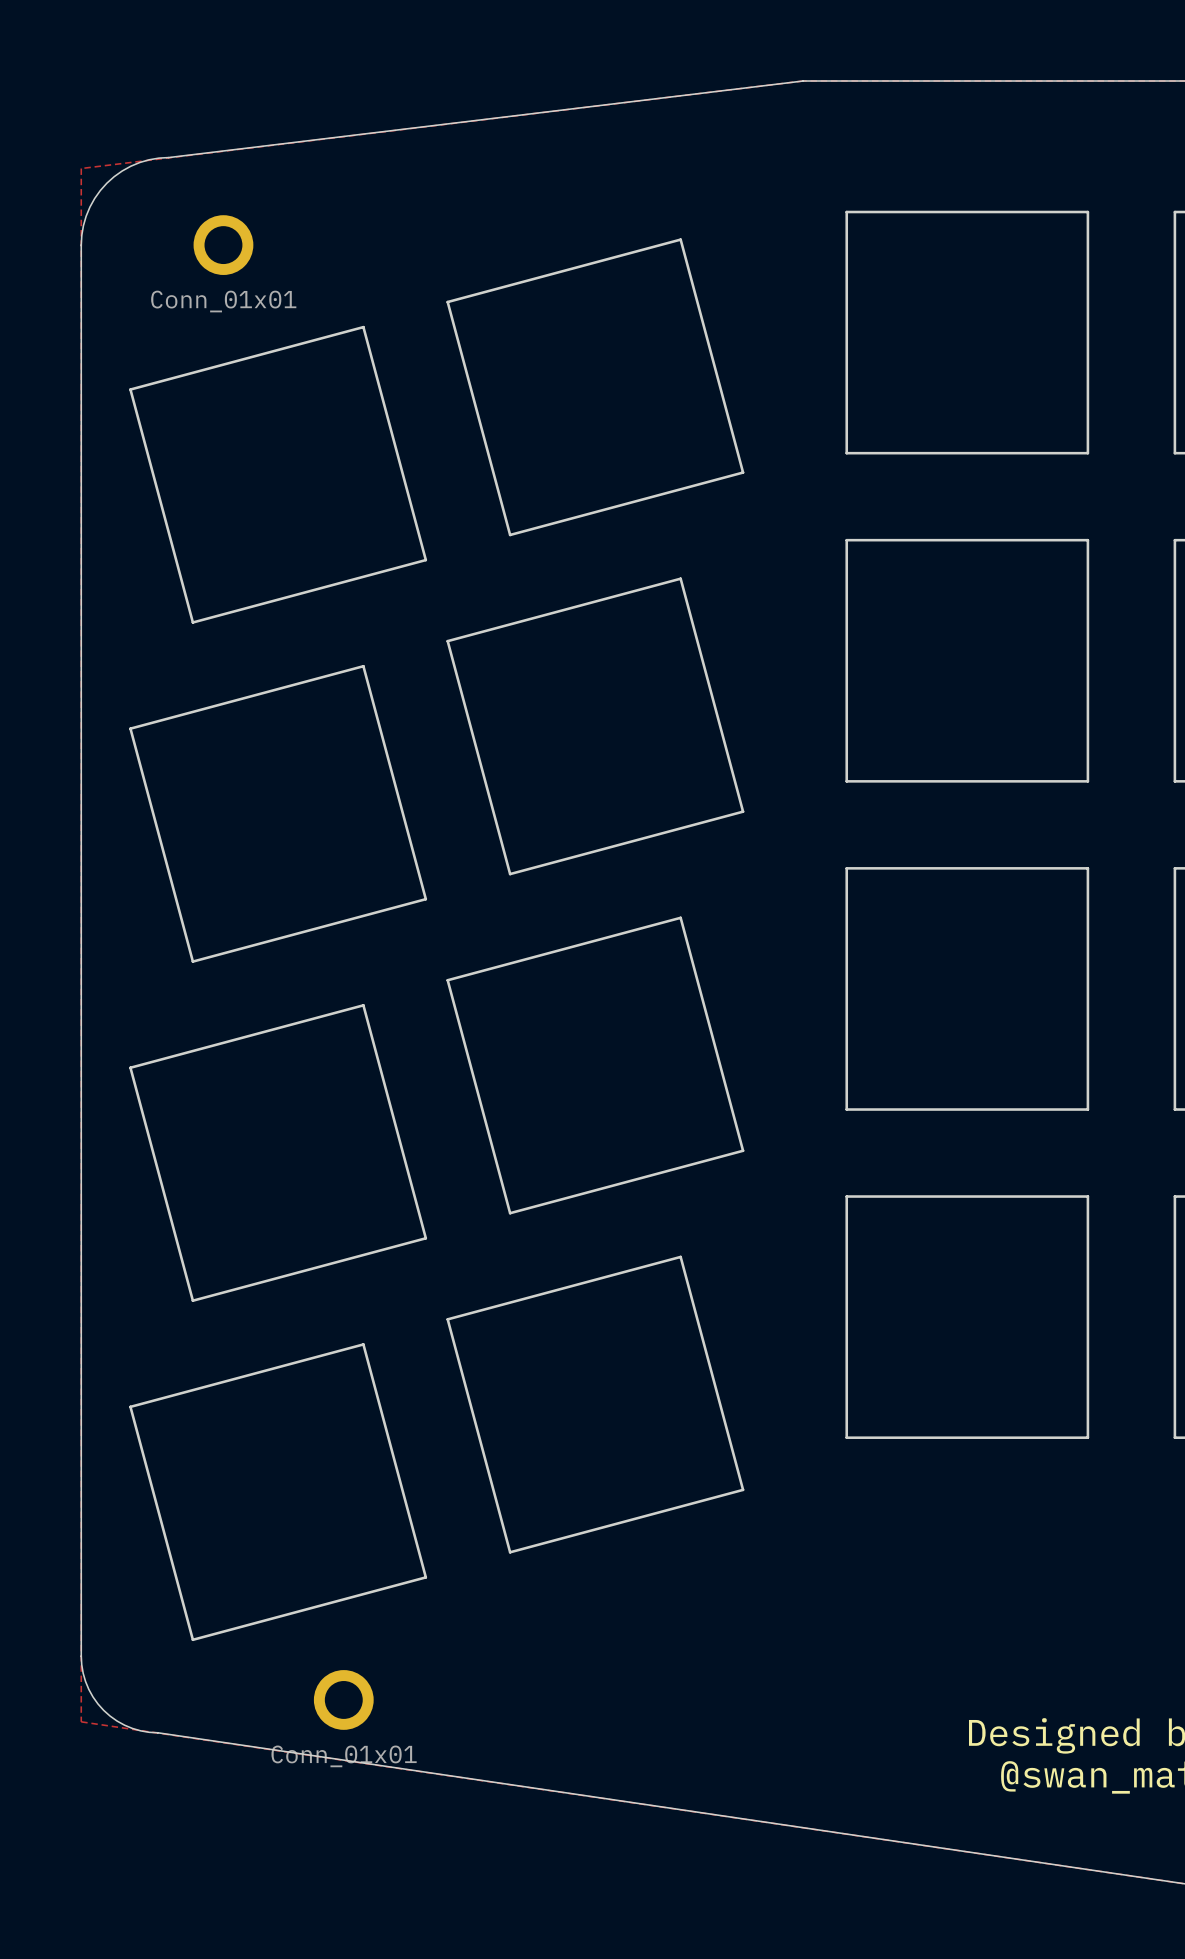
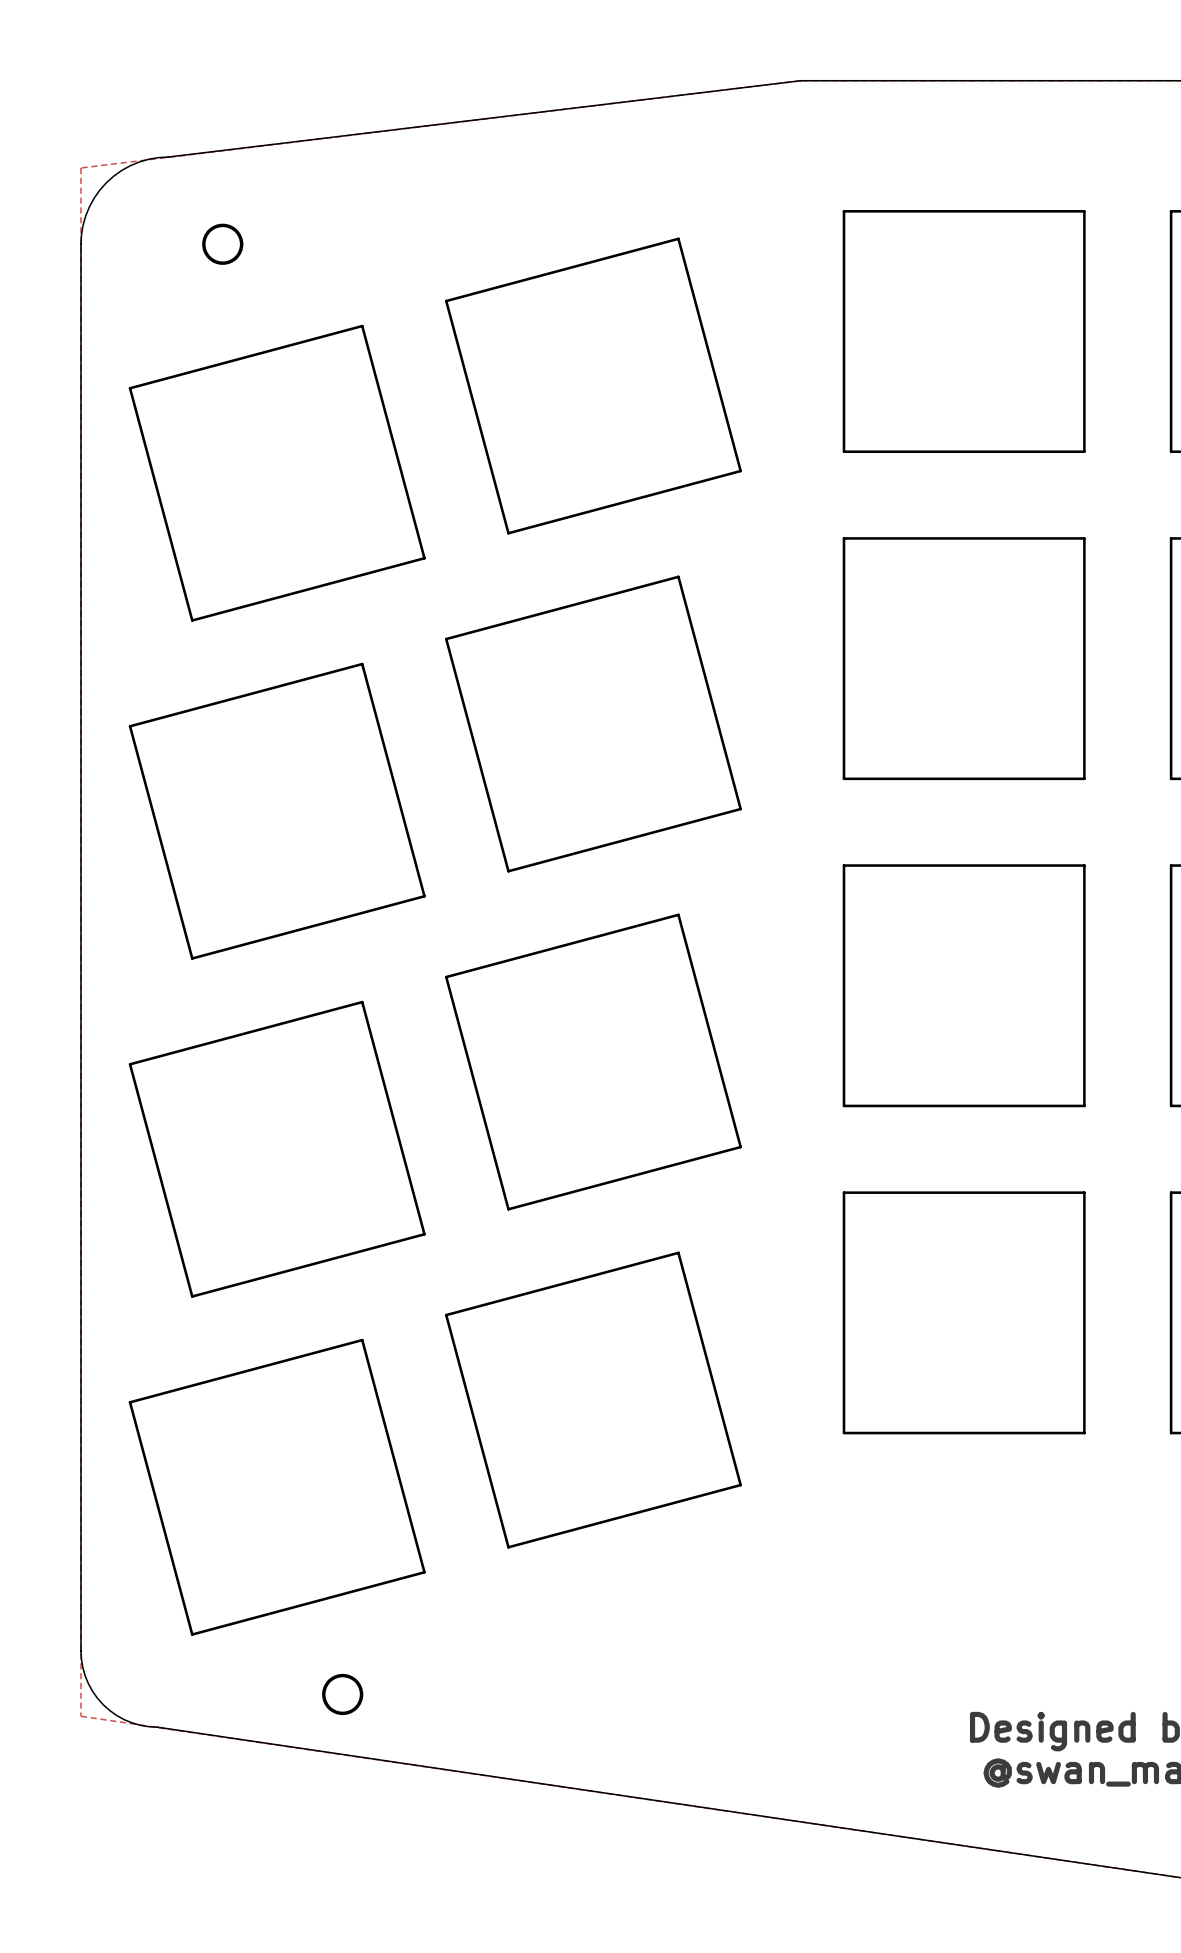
round board edge: none -> [202, 223, 244, 265]
part: Conn_01x01 (223, 245) -> none
round board edge: none -> [322, 1673, 364, 1716]
part: Conn_01x01 (343, 1699) -> none

